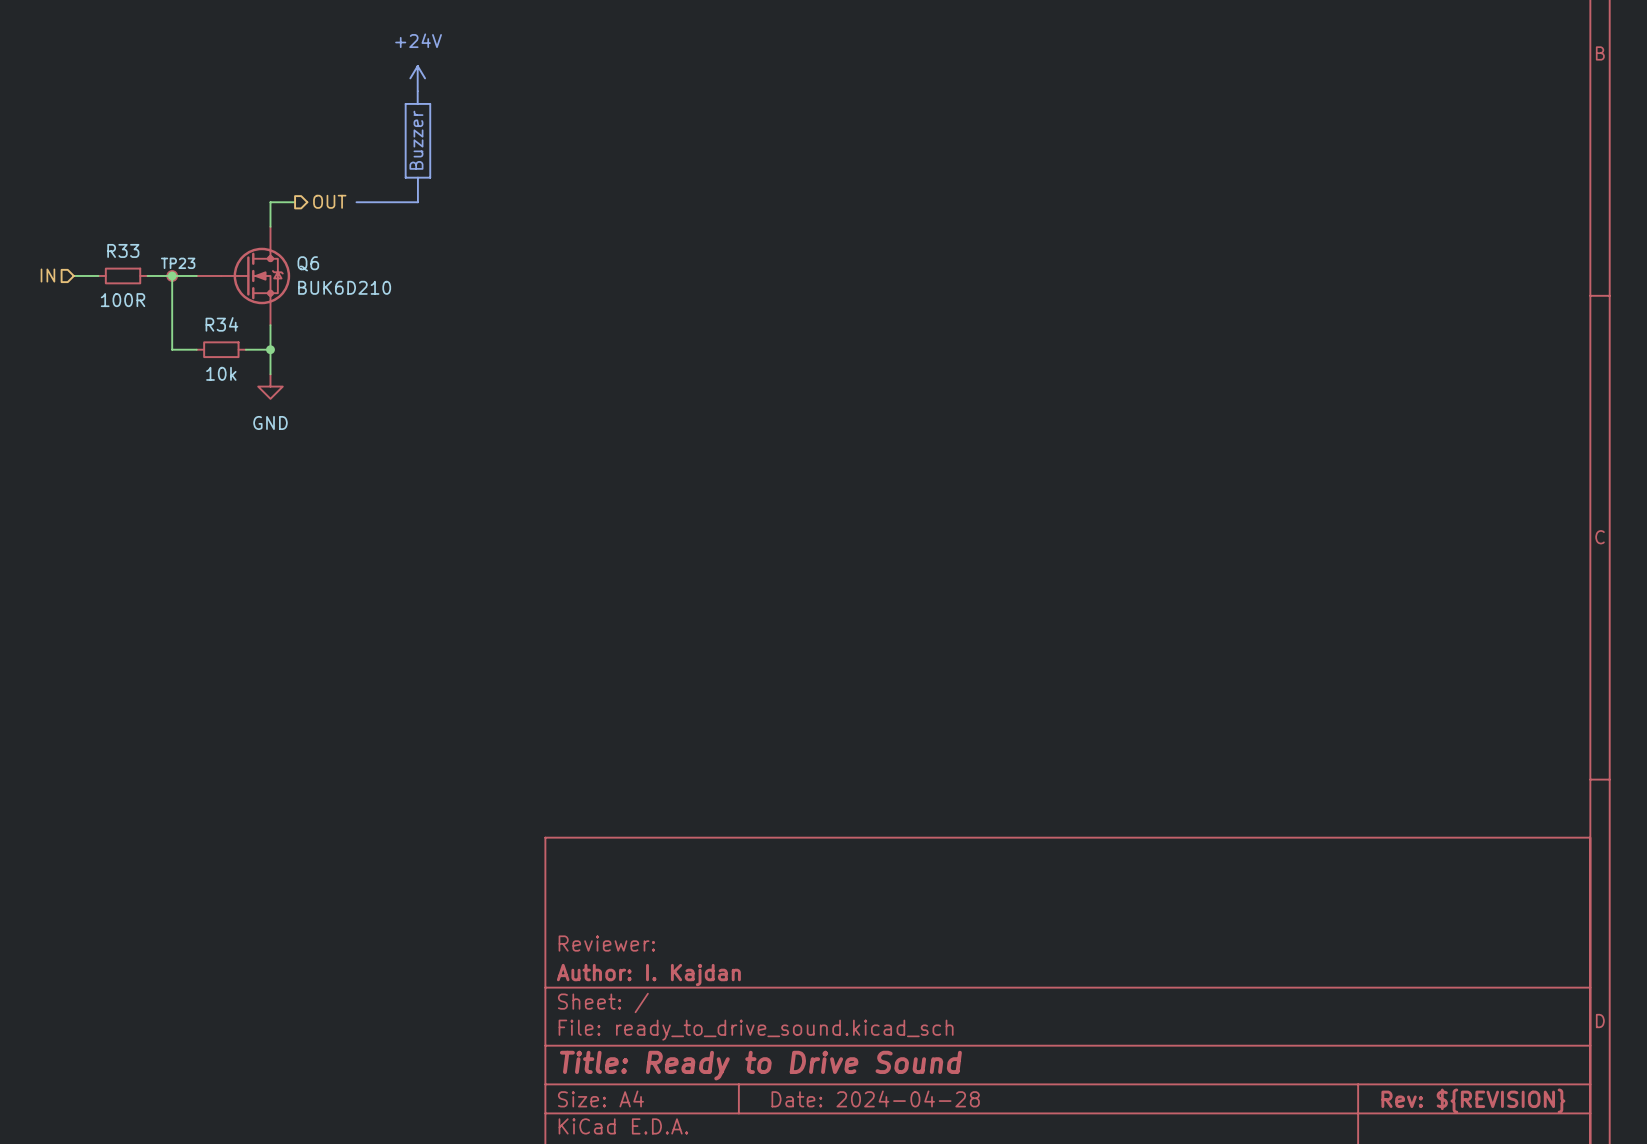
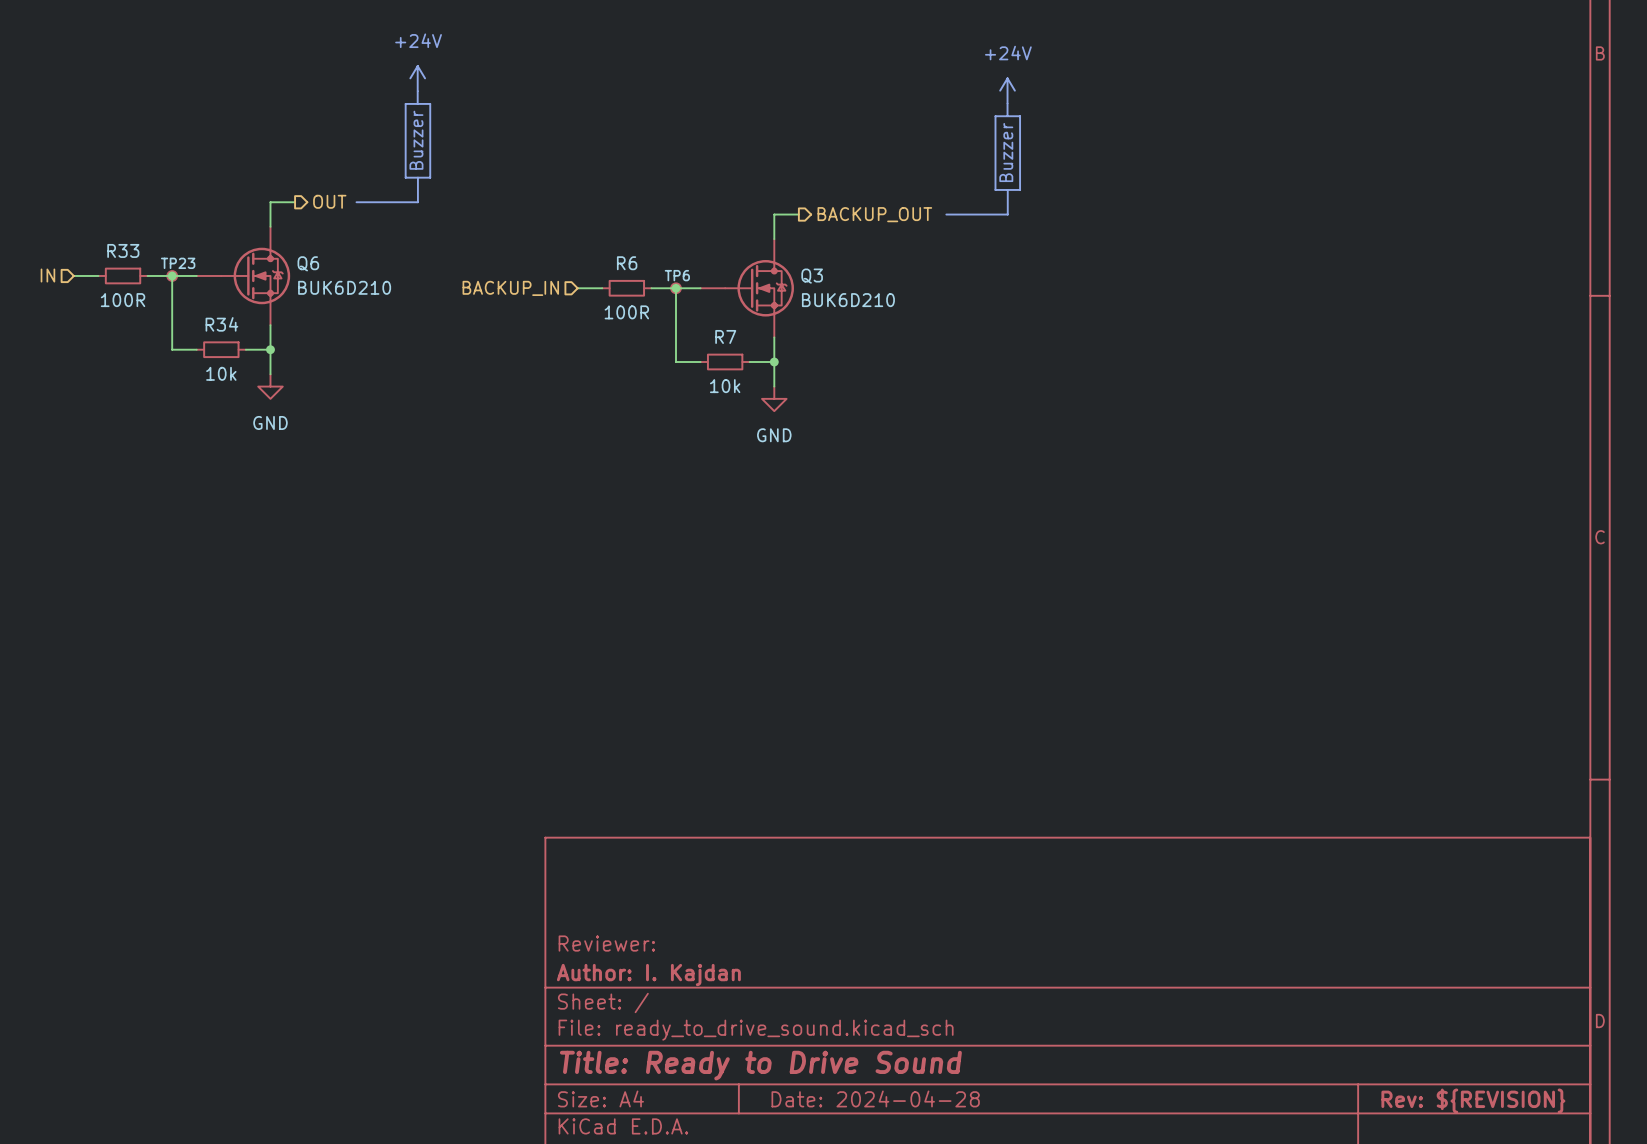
text: none -> +24V (1008, 53)
line: none -> (1007, 78) (1014, 90)
line: none -> (1007, 78) (1007, 103)
line: none -> (1007, 78) (1000, 90)
line: none -> (1007, 103) (1007, 115)
line: none -> (995, 116) (1020, 116) (1020, 189) (995, 189) (995, 116)
text: none -> Buzzer (1006, 152)
line: none -> (1007, 189) (1007, 214) (946, 214)
wire: none -> (798, 214) (774, 214) (774, 239)
hierarchical label: none -> BACKUP_OUT (874, 214)
hierarchical label: none -> BACKUP_IN (510, 288)
wire: none -> (577, 288) (602, 288)
R6: none -> 100R (626, 288)
wire: none -> (651, 288) (700, 288)
wire: none -> (676, 288) (676, 362) (700, 362)
junction: none -> (676, 288)
TP6: none -> (676, 288)
Q3: none -> BUK6D210 (747, 288)
wire: none -> (774, 337) (774, 386)
R7: none -> 10k (725, 362)
wire: none -> (749, 362) (774, 362)
junction: none -> (774, 362)
power symbol: none -> GND (774, 398)

